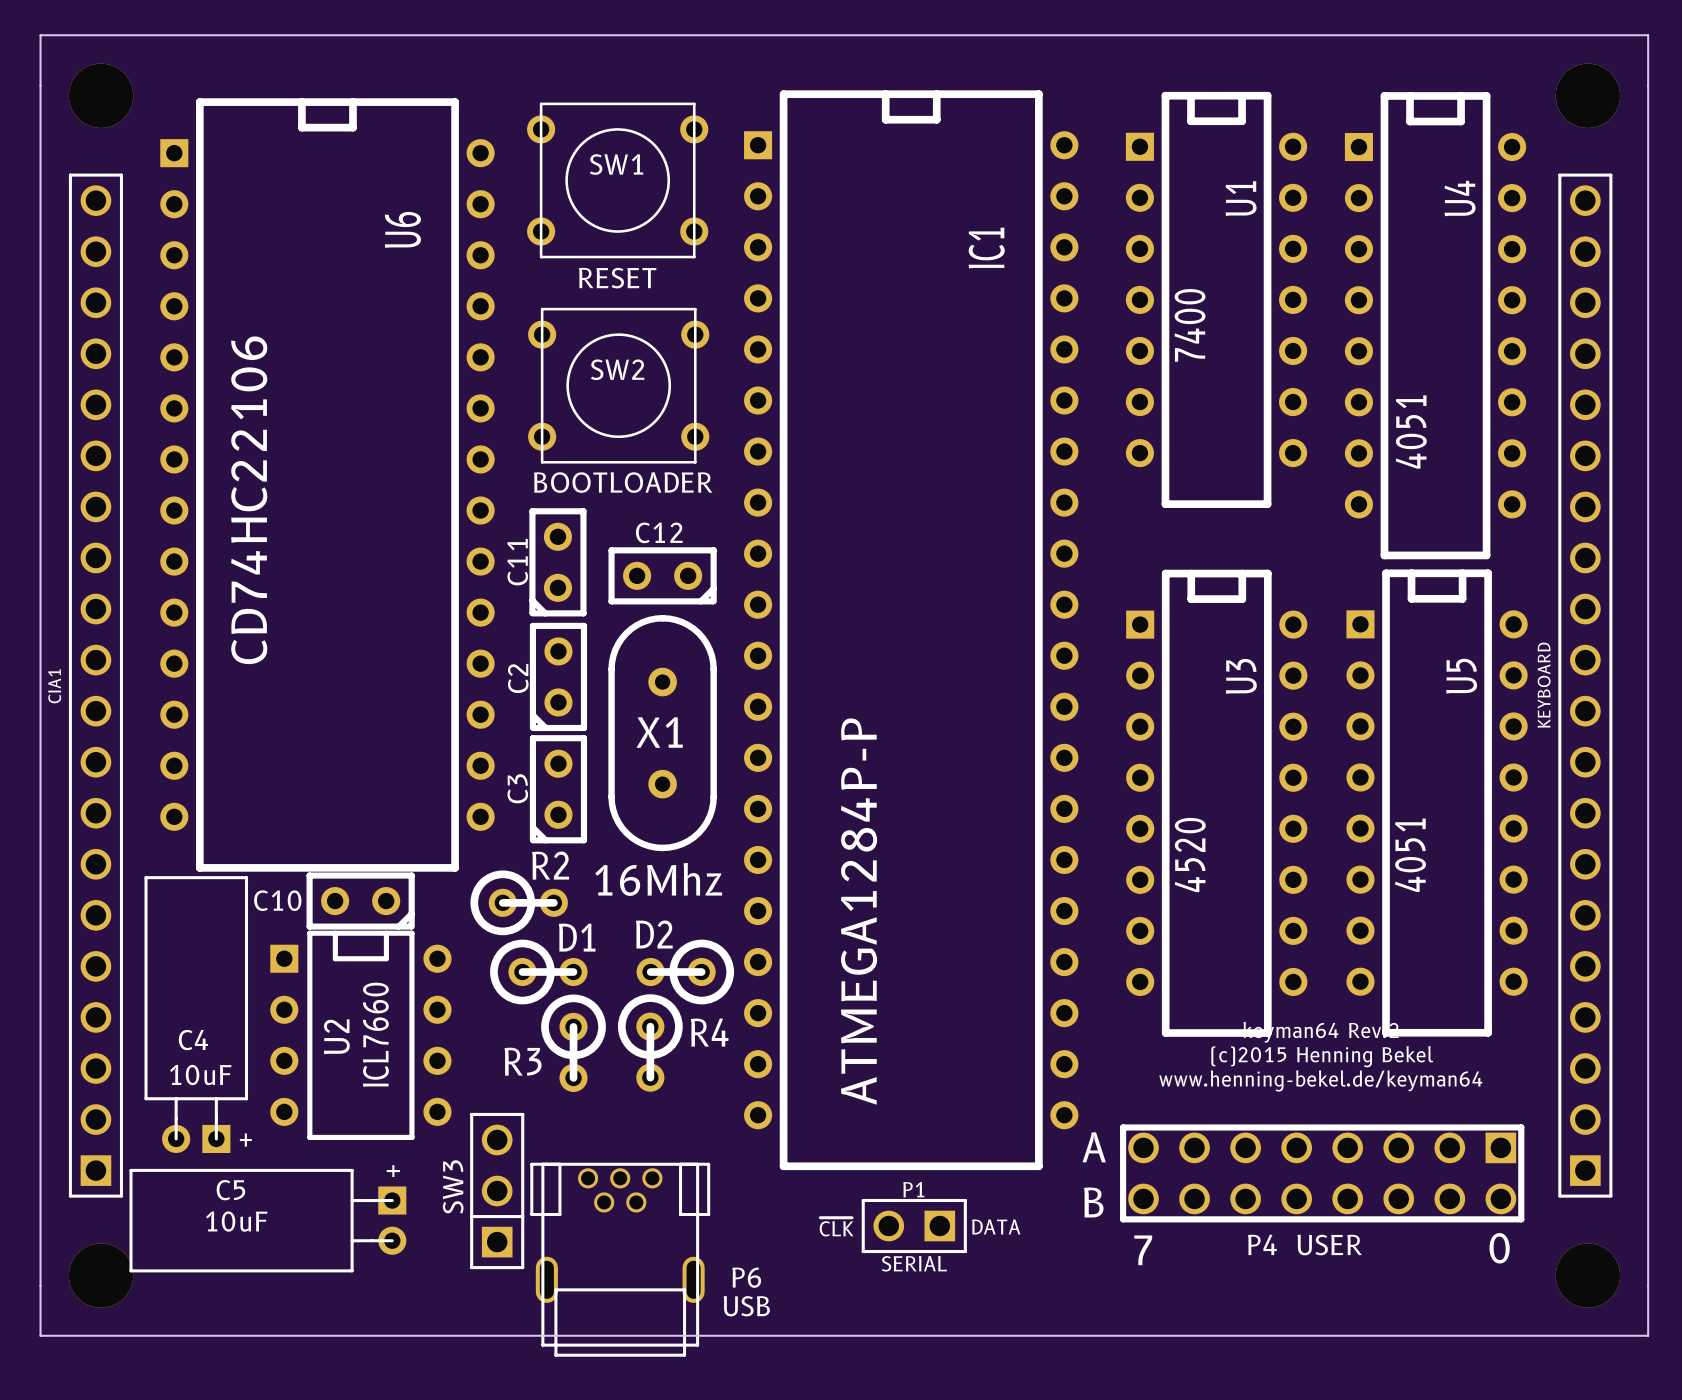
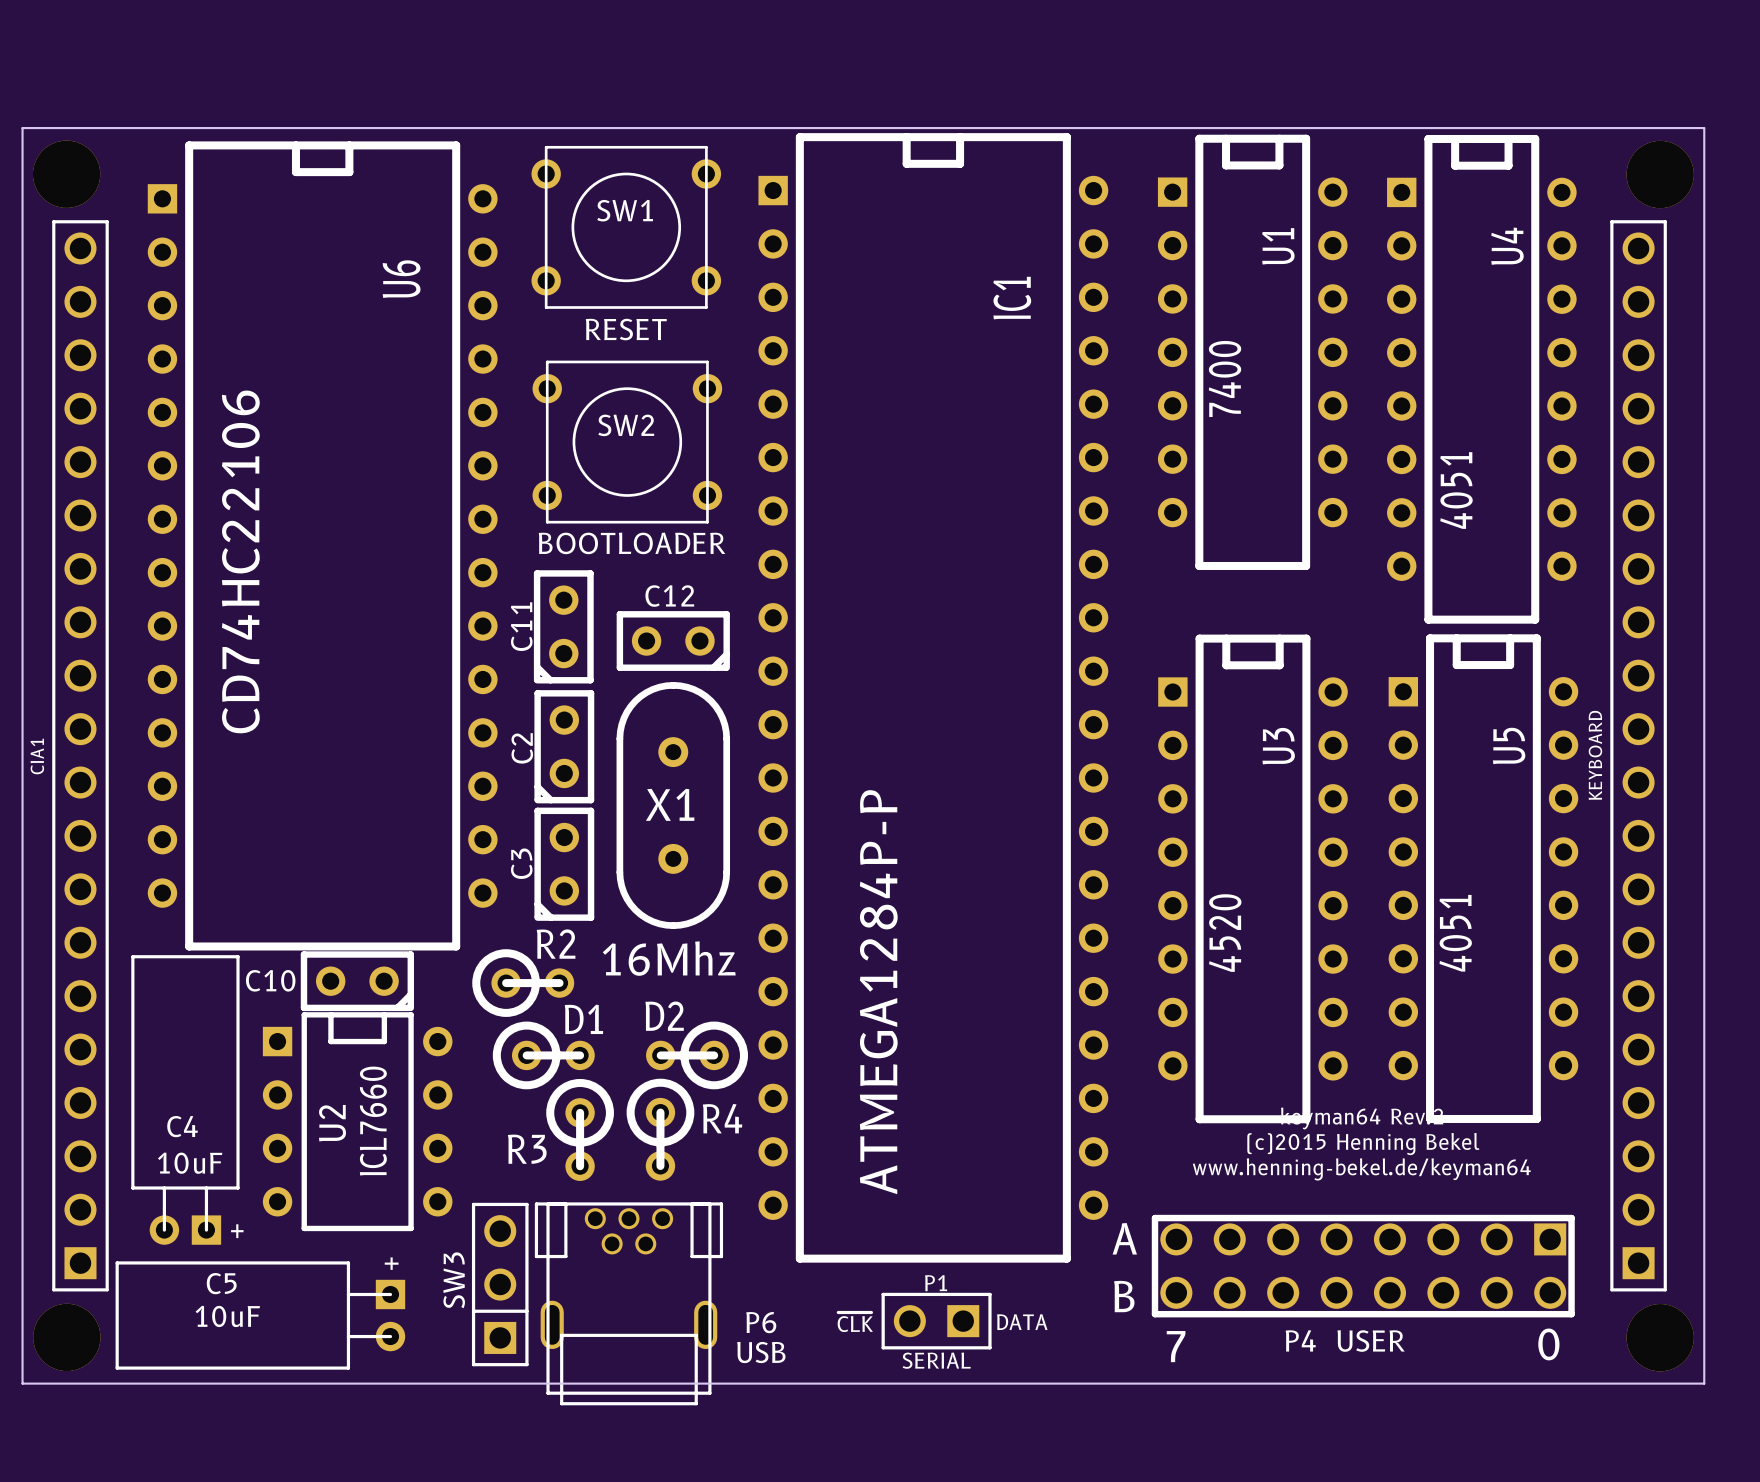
board edge: (40, 85) (40, 35) (1648, 35) (1648, 85) -> (22, 128) (1704, 128)
part position: (101, 95) -> (66, 174)
part position: (1587, 95) -> (1660, 174)
P6 position: (620, 1259) -> (628, 1303)
part position: (101, 1275) -> (66, 1337)
part position: (1587, 1275) -> (1660, 1337)
board edge: (40, 1285) (40, 1335) (1648, 1335) (1648, 1285) -> (22, 1383) (1704, 1383)

